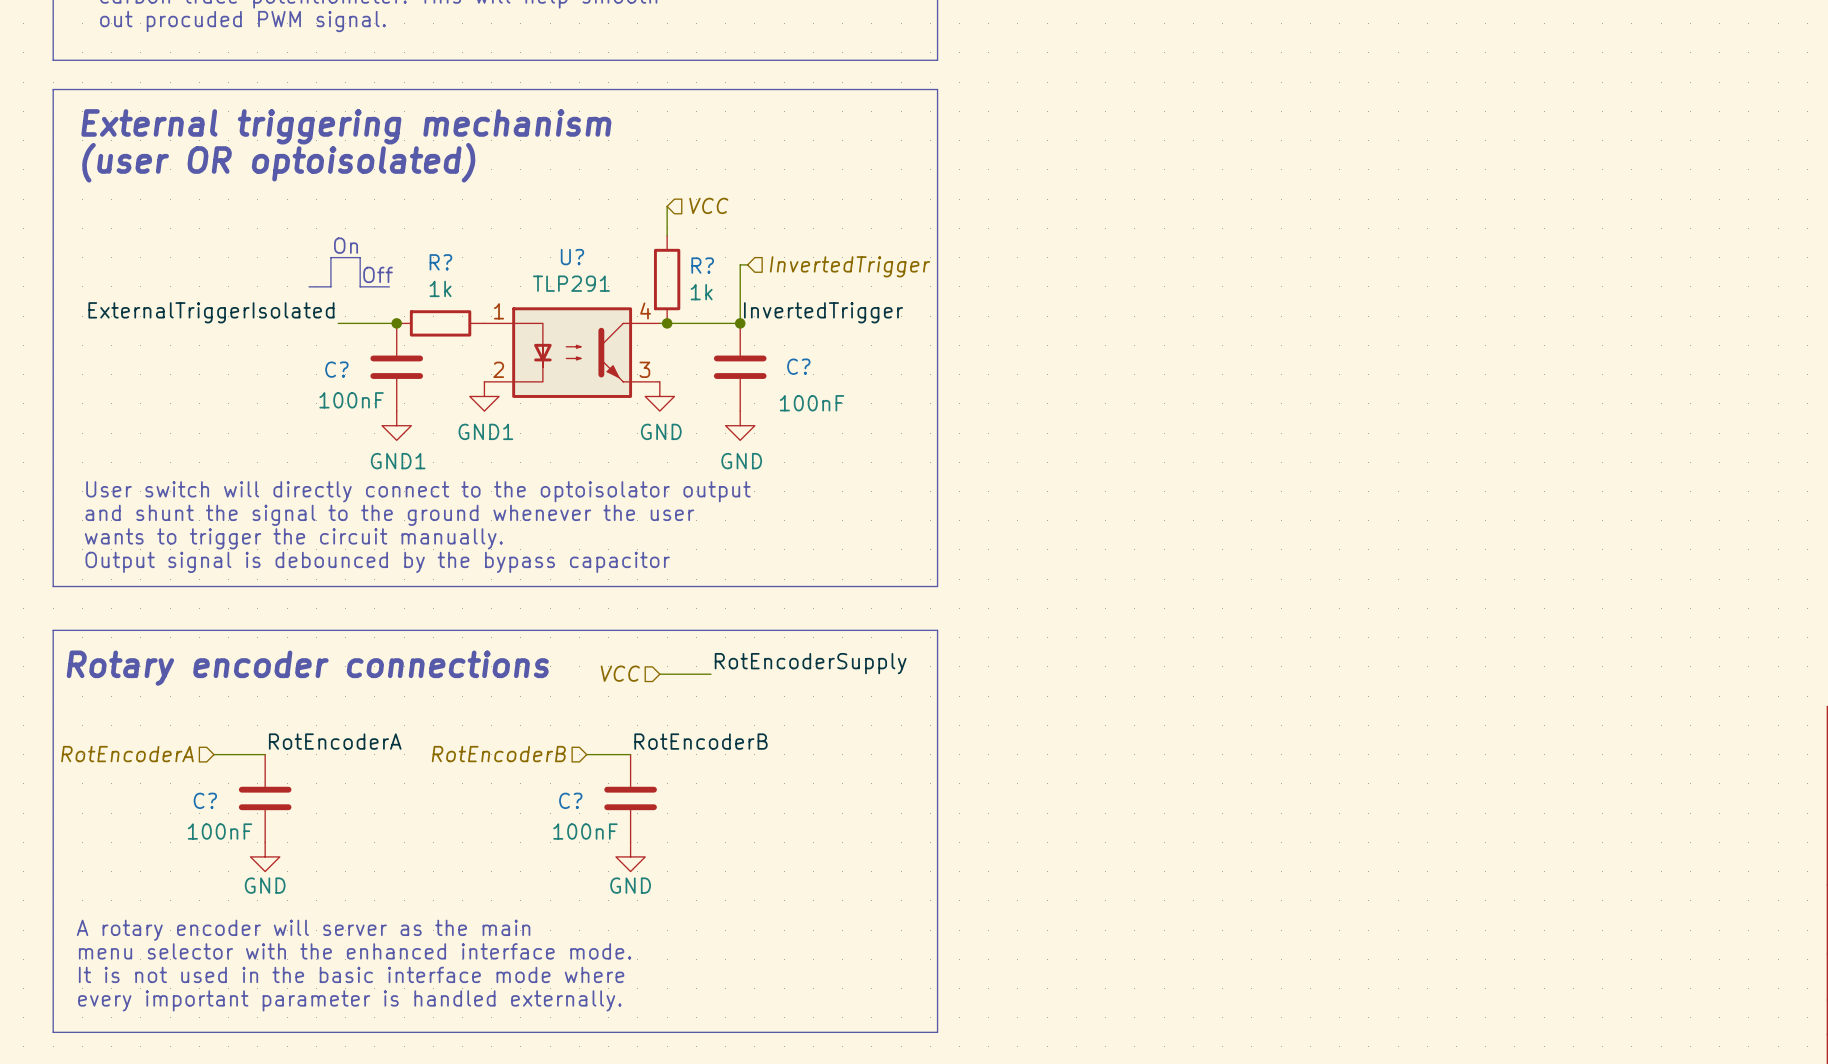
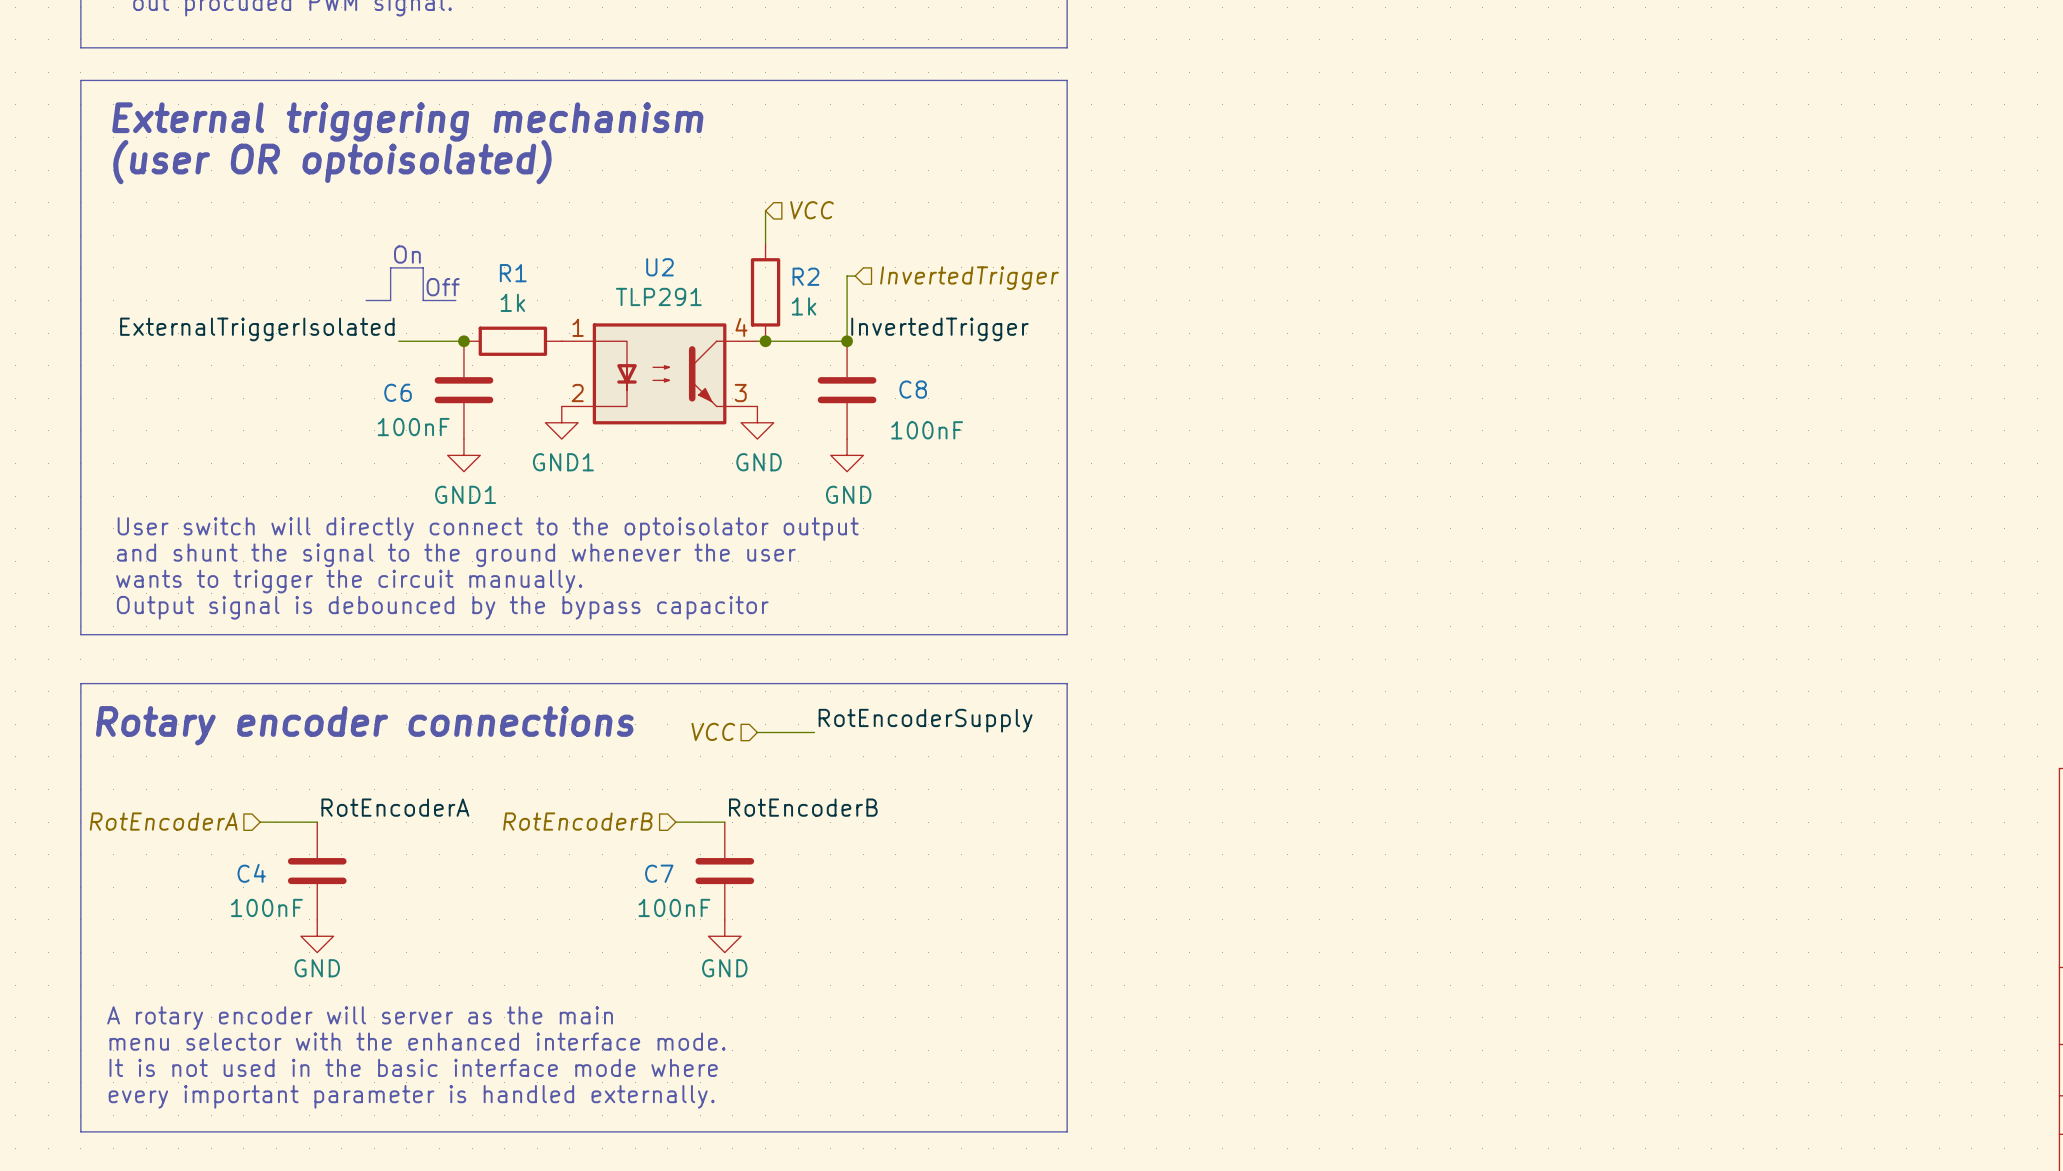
U? name: U? (572, 257) -> U2 (659, 267)
R? name: R? (440, 262) -> R1 (513, 273)
R? name: R? (702, 265) -> R2 (805, 276)
C? name: C? (798, 366) -> C8 (913, 389)
C? name: C? (336, 369) -> C6 (398, 392)
C? name: C? (205, 800) -> C4 (251, 873)
C? name: C? (570, 800) -> C7 (659, 873)

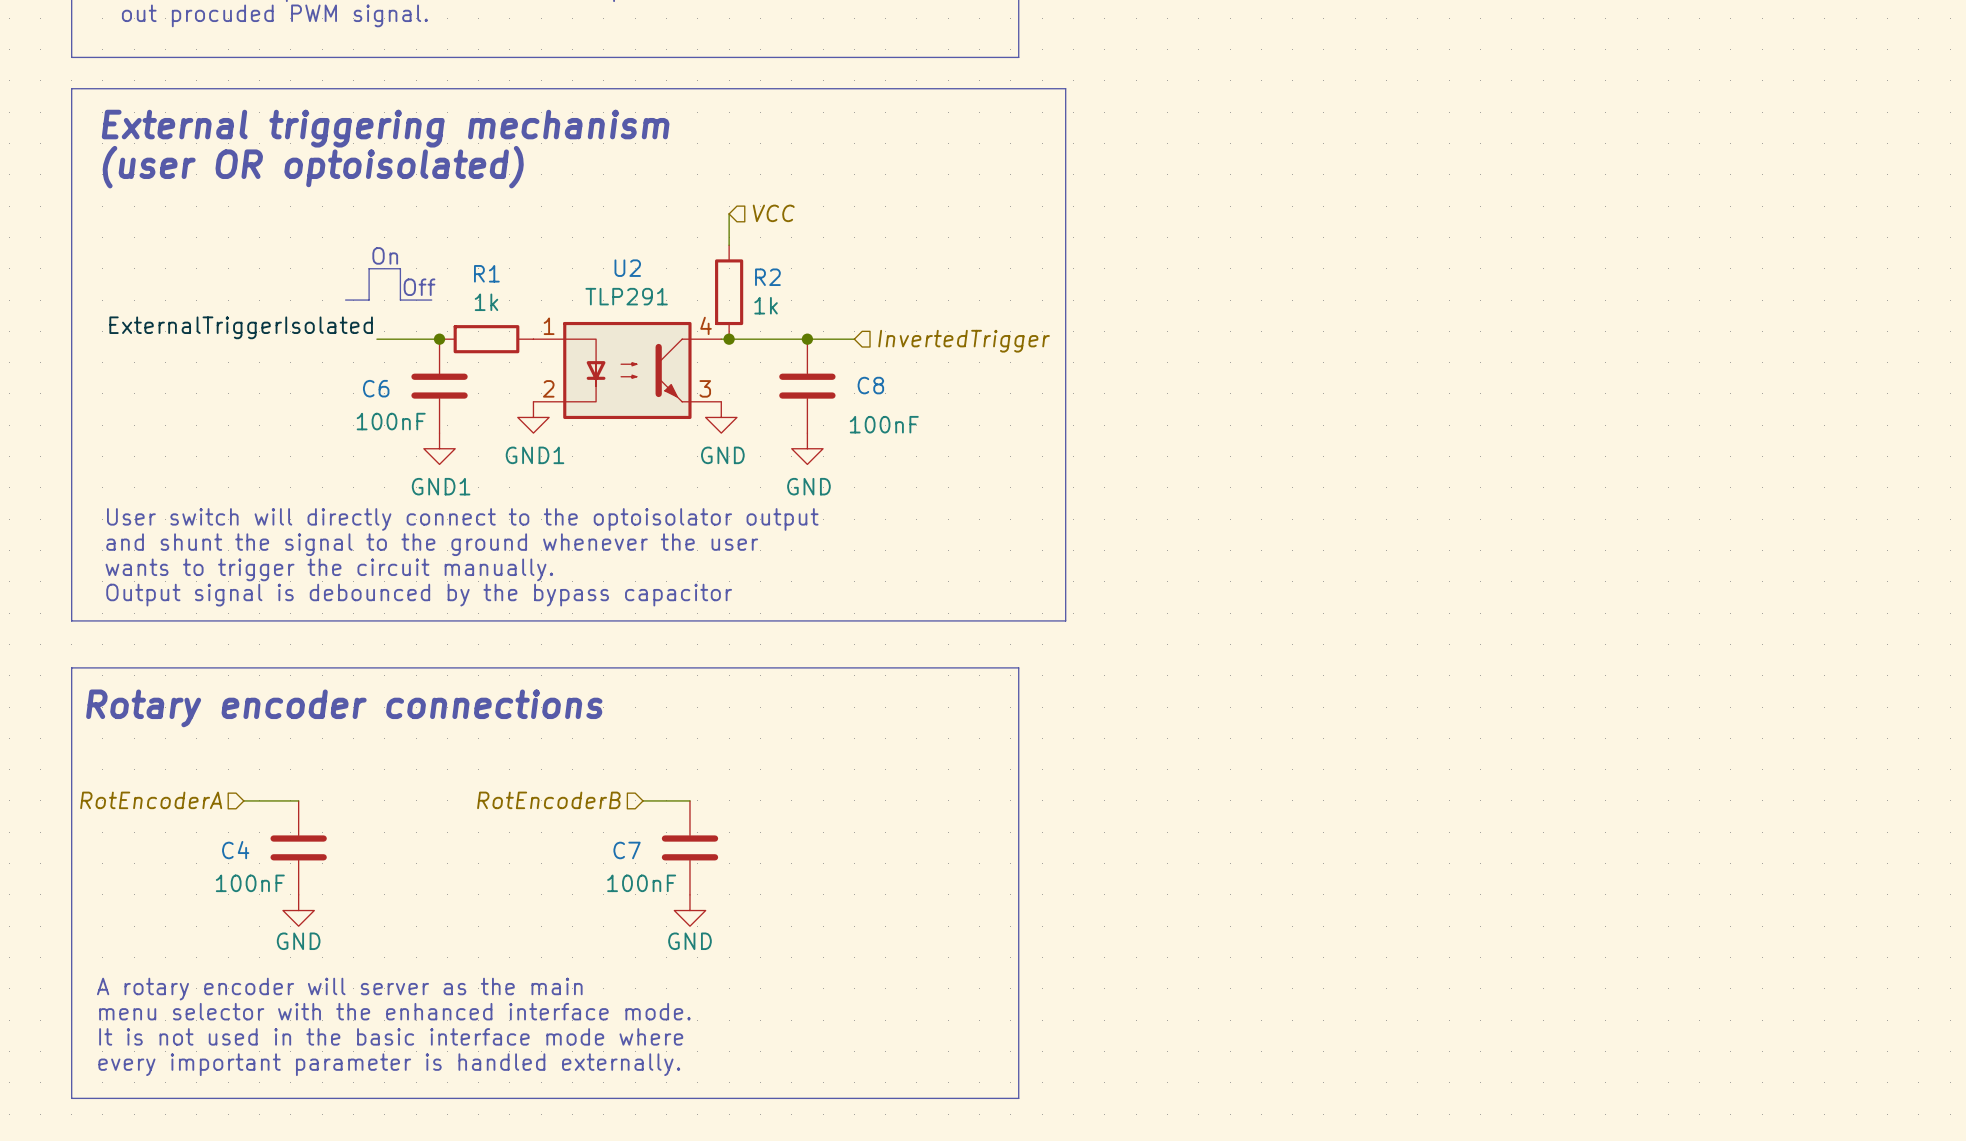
line: (1067, 80) (1067, 634) -> (1018, 88) (1065, 88) (1065, 620) (1018, 620)
wire: (855, 276) (847, 276) (847, 341) -> (854, 339) (807, 339)
hierarchical label position: InvertedTrigger (969, 278) -> InvertedTrigger (964, 341)
label: InvertedTrigger (939, 329) -> none
label: RotEncoderSupply (925, 720) -> none
hierarchical label: VCC (713, 731) -> none
wire: (757, 732) (814, 732) -> none
label: RotEncoderA (395, 807) -> none
label: RotEncoderB (803, 807) -> none

